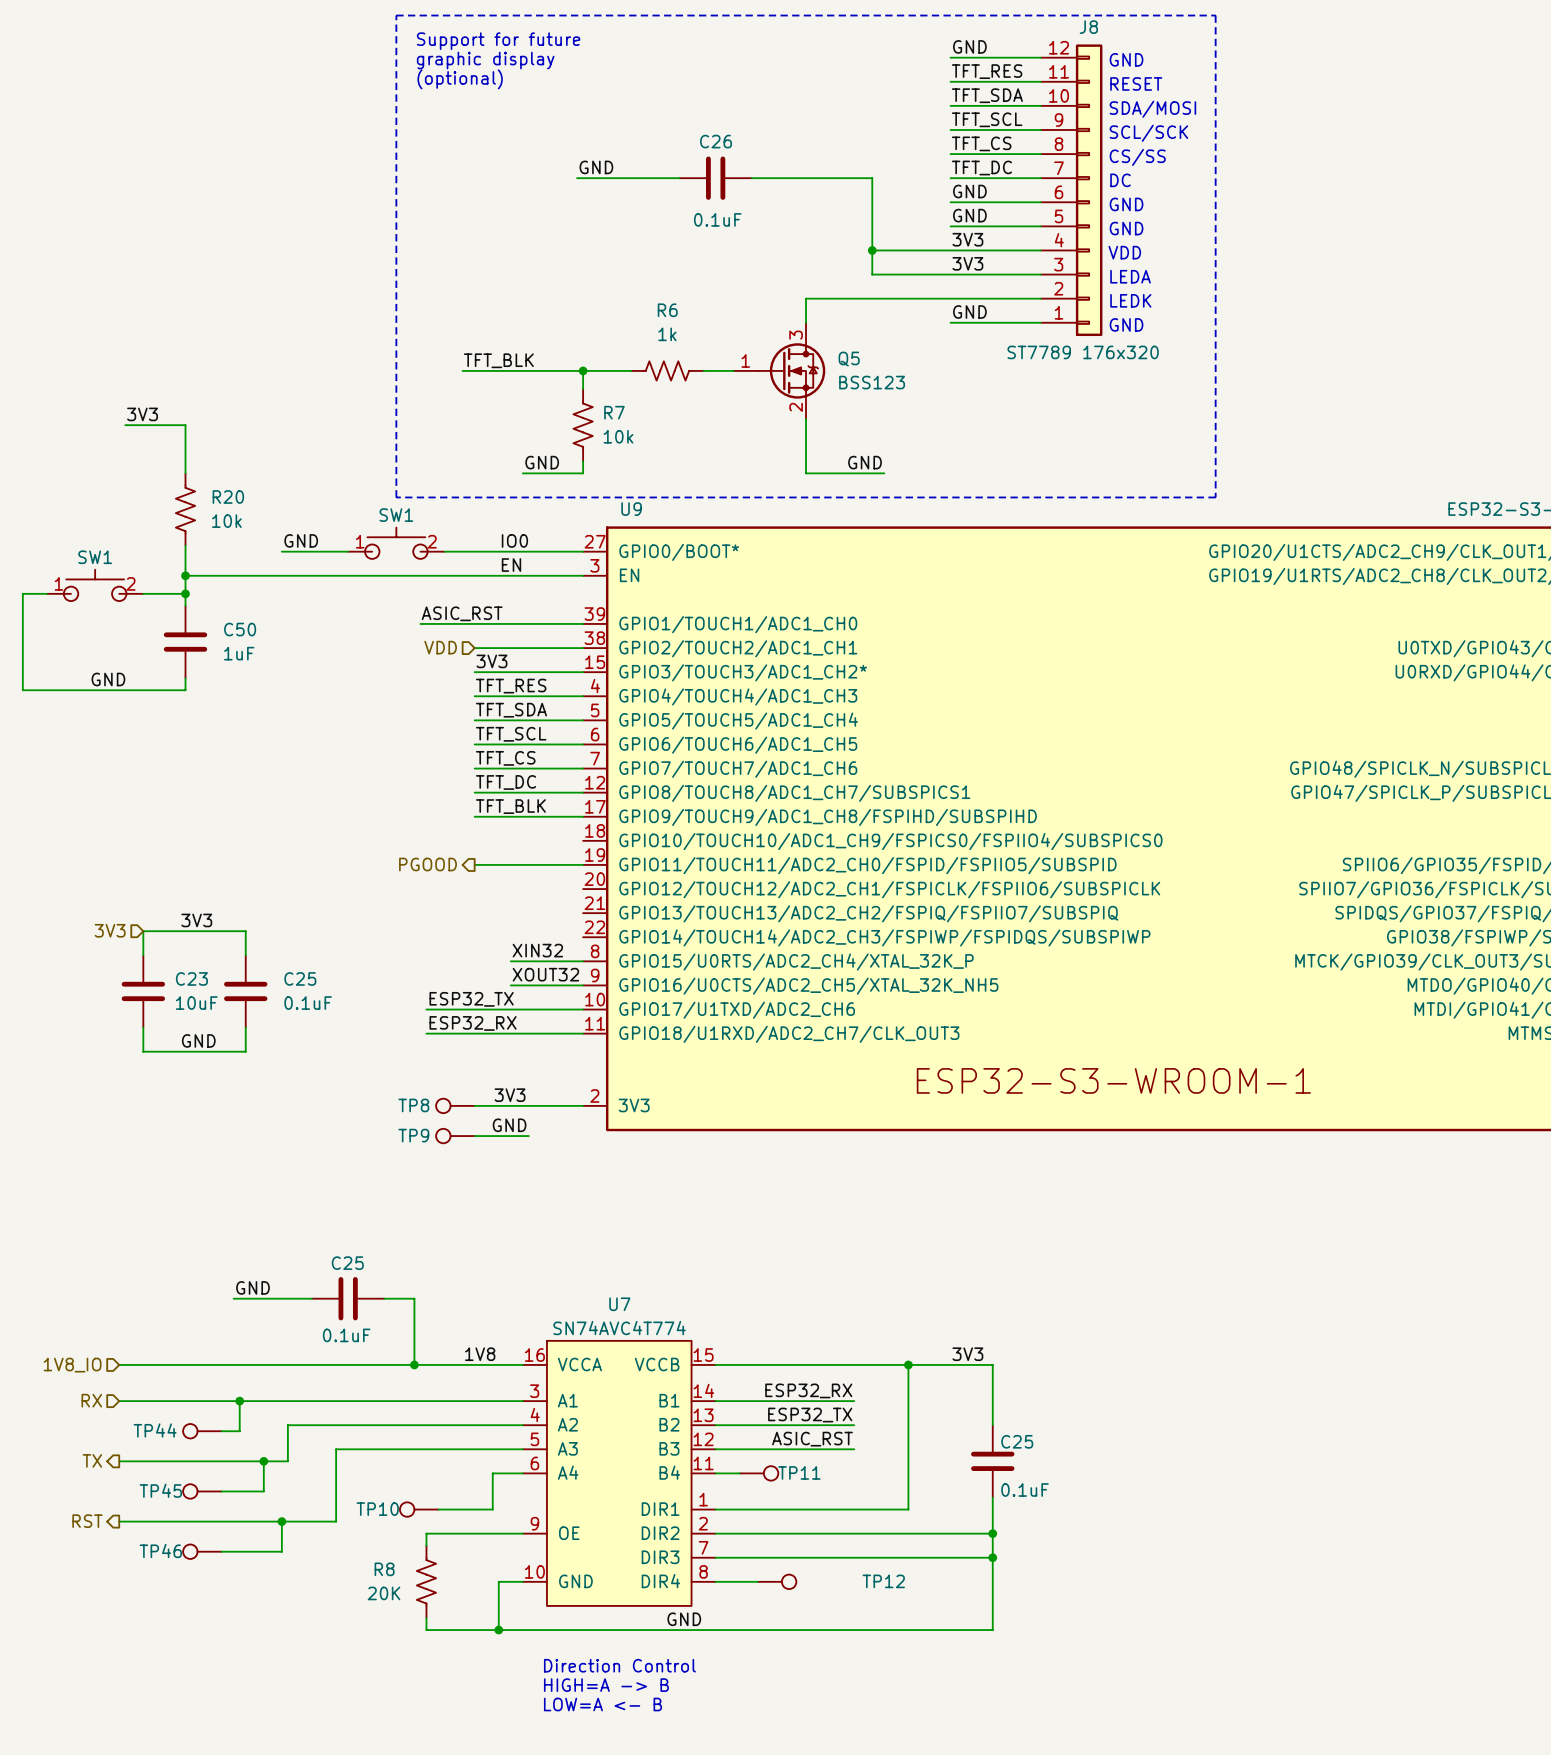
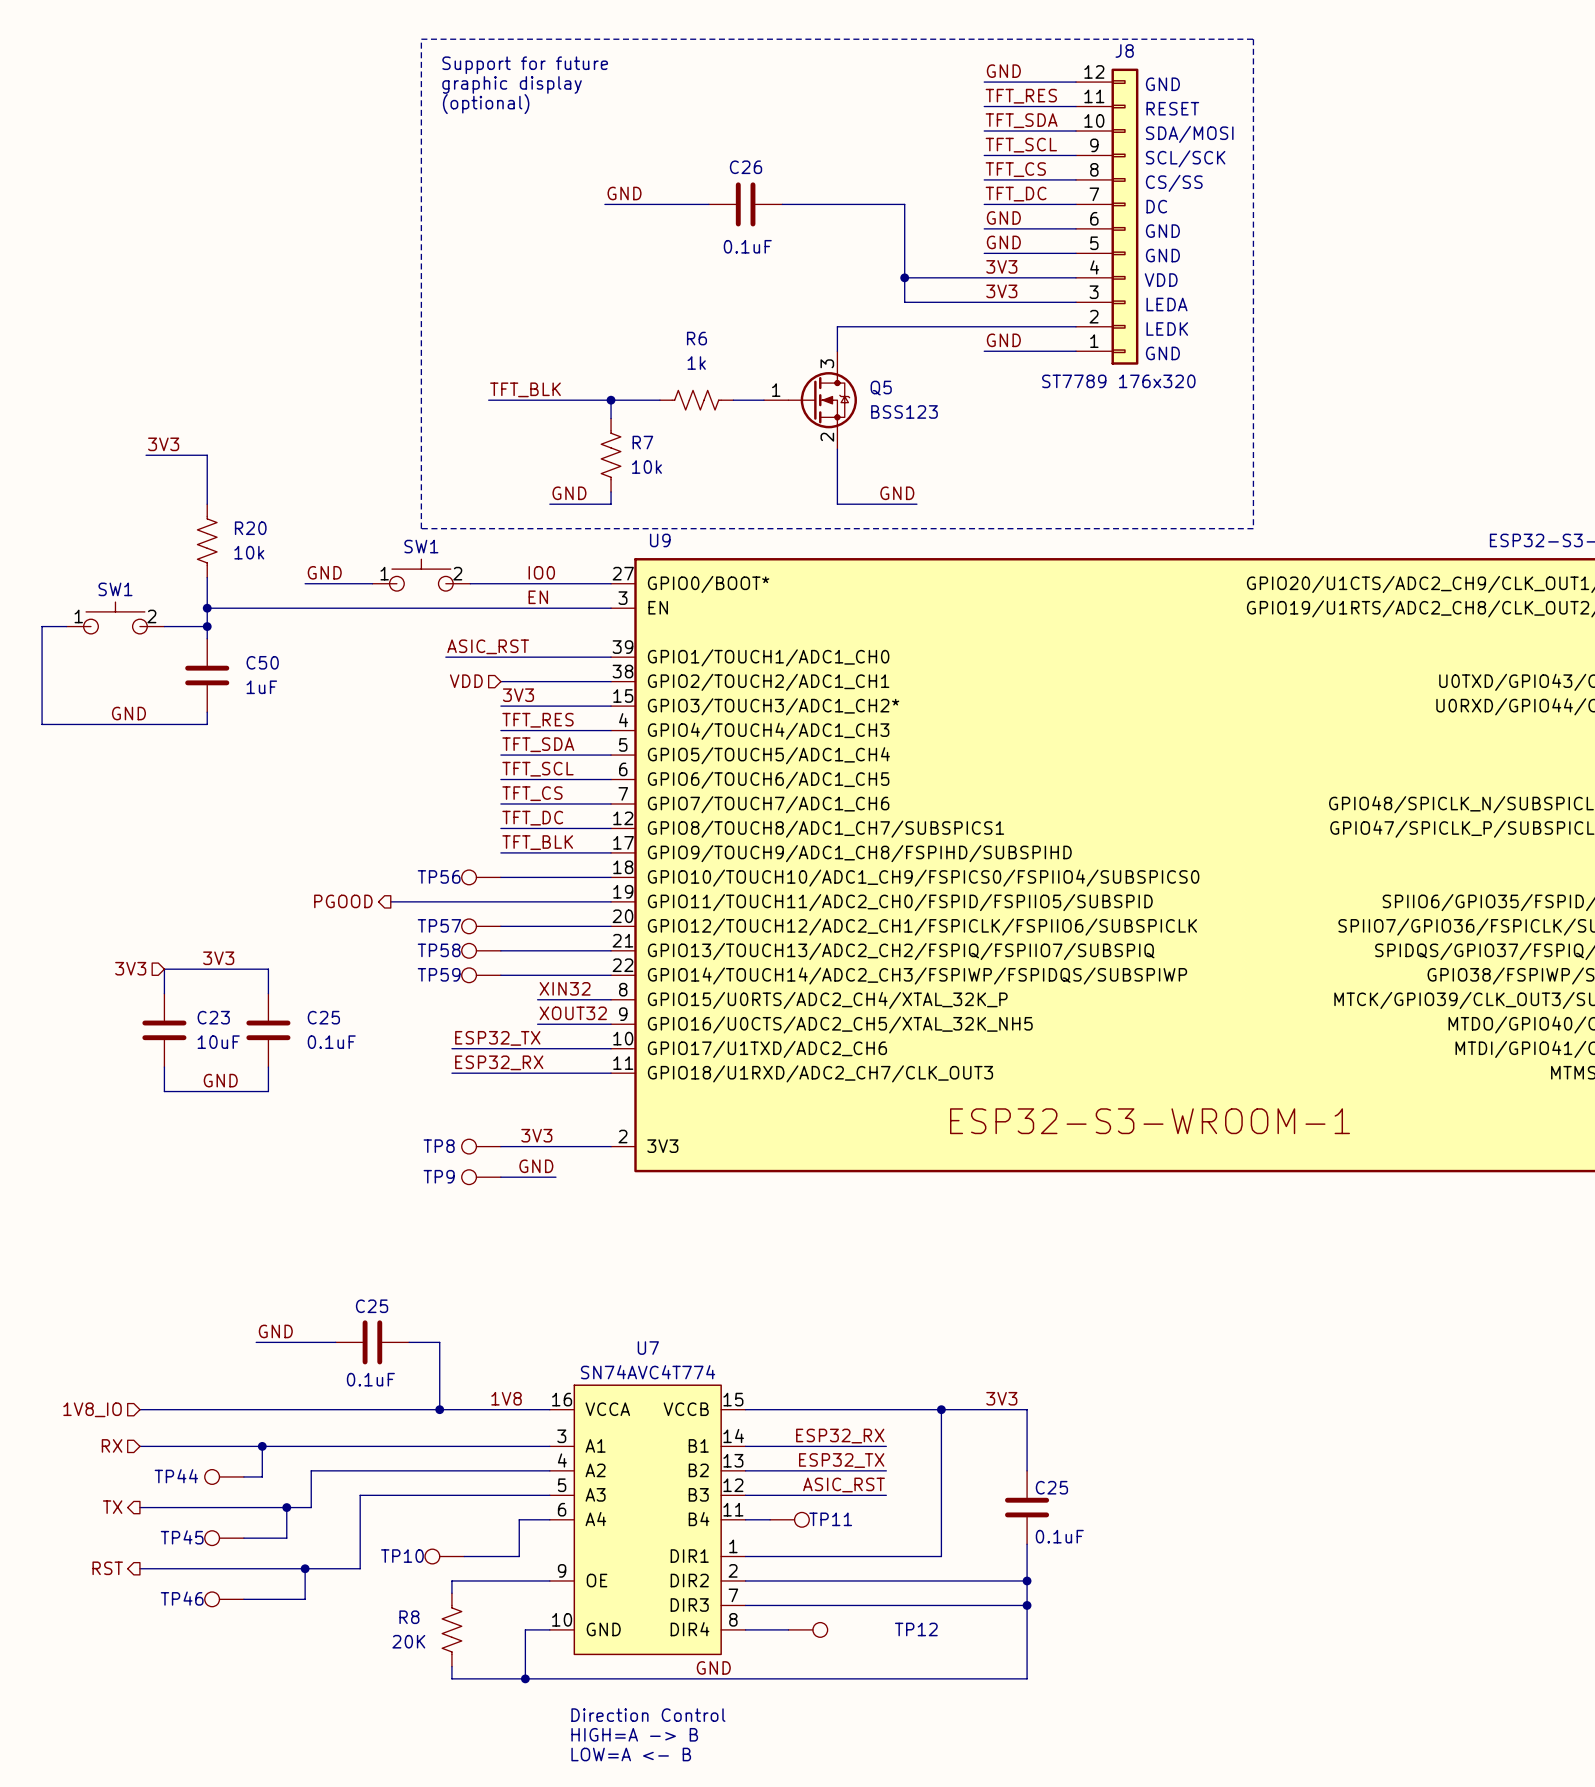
TP56: none -> (481, 877)
wire: none -> (500, 877) (611, 877)
wire: none -> (390, 901) (500, 901)
hierarchical label position: PGOOD (428, 864) -> PGOOD (343, 901)
TP57: none -> (481, 926)
wire: none -> (500, 926) (611, 926)
TP58: none -> (481, 950)
wire: none -> (500, 950) (611, 950)
TP59: none -> (481, 975)
wire: none -> (500, 975) (611, 975)

